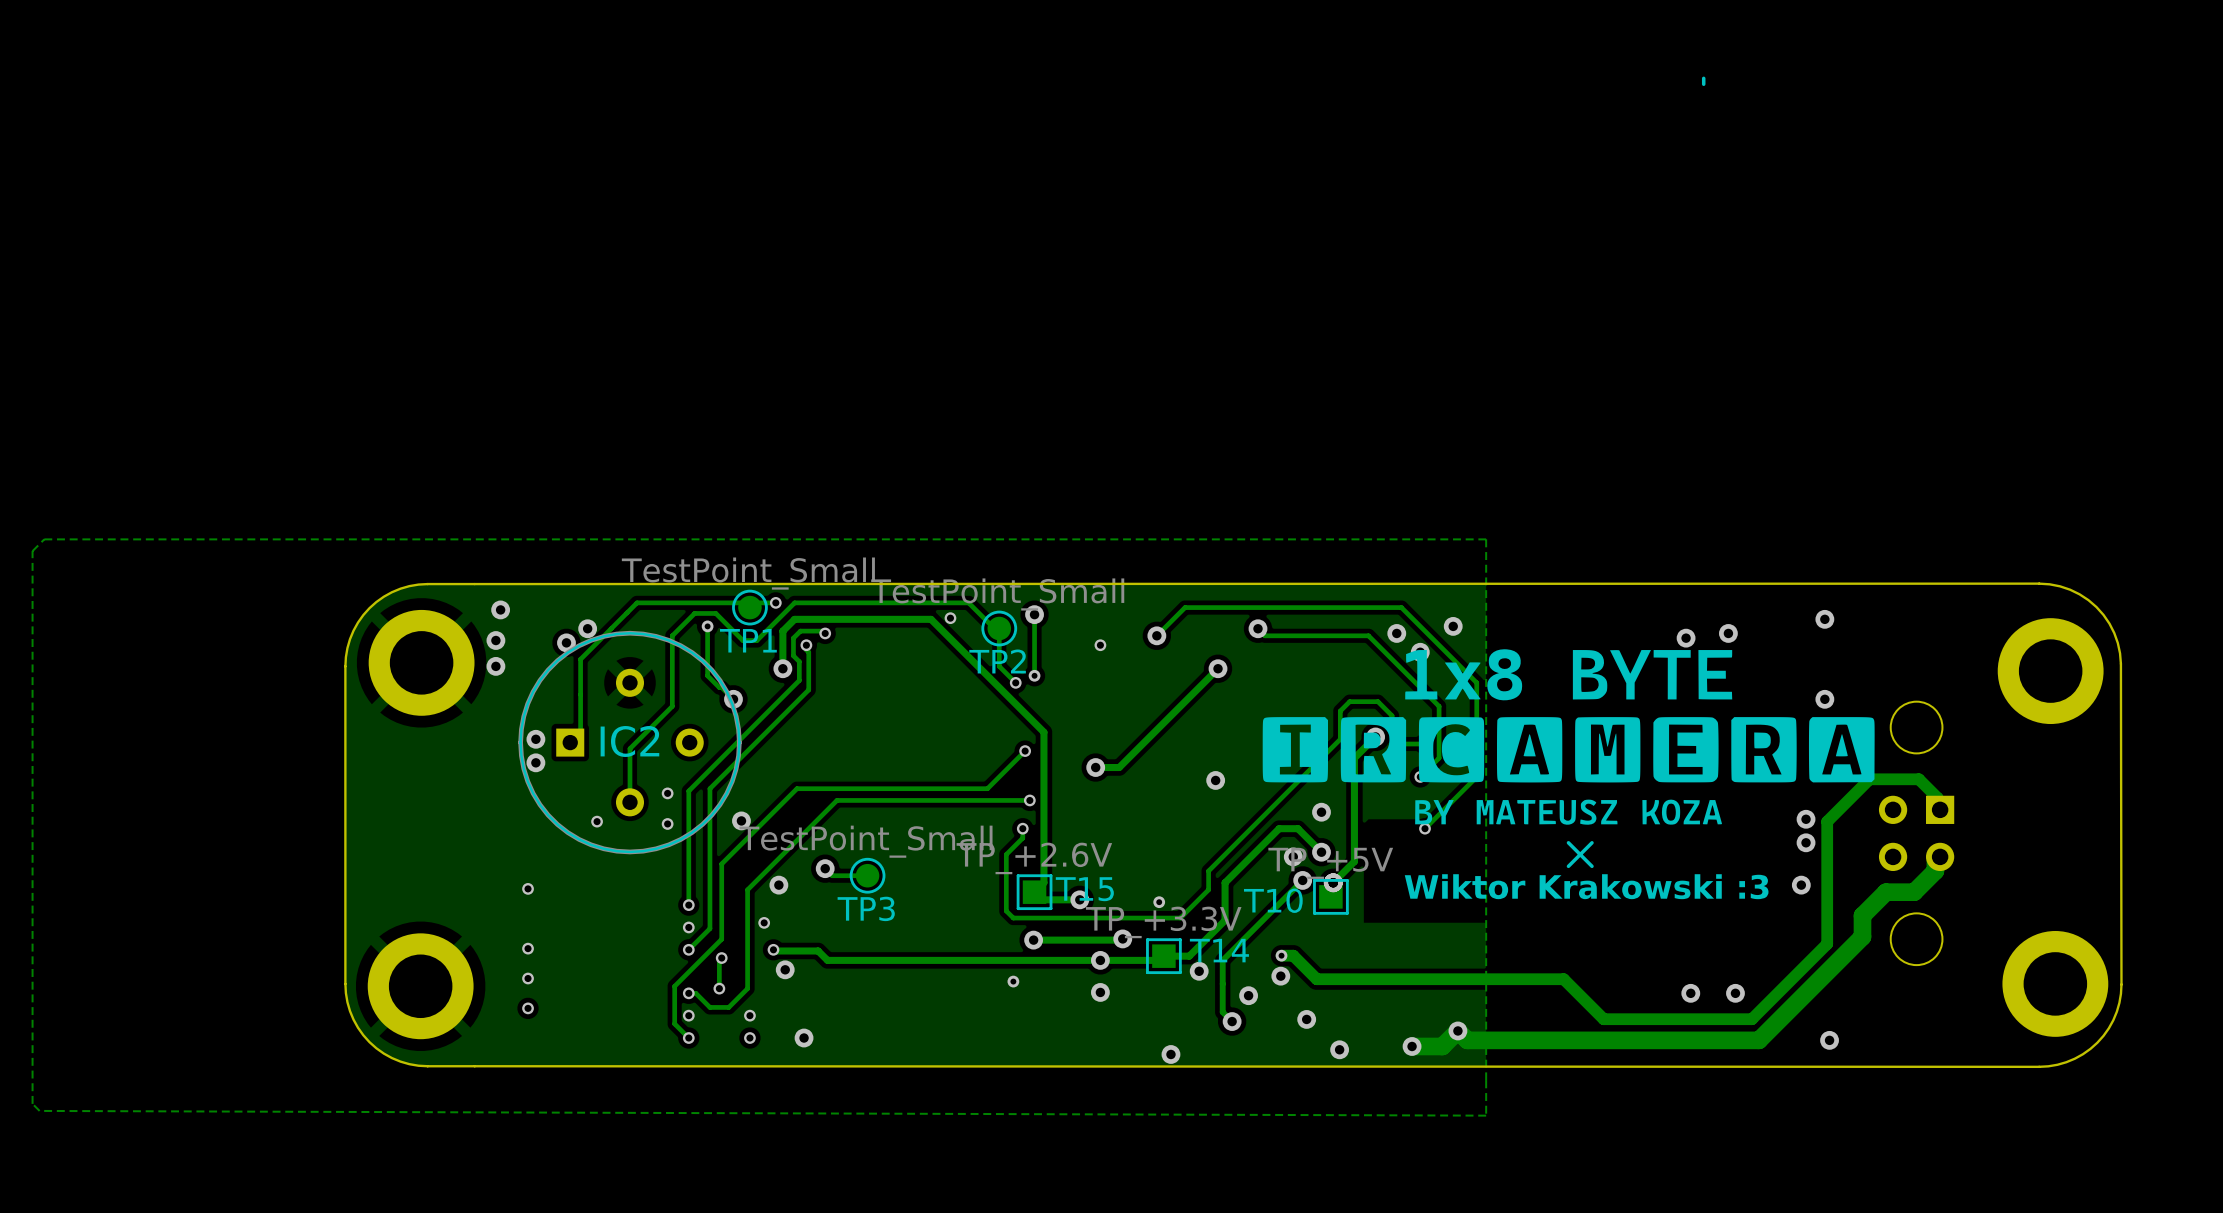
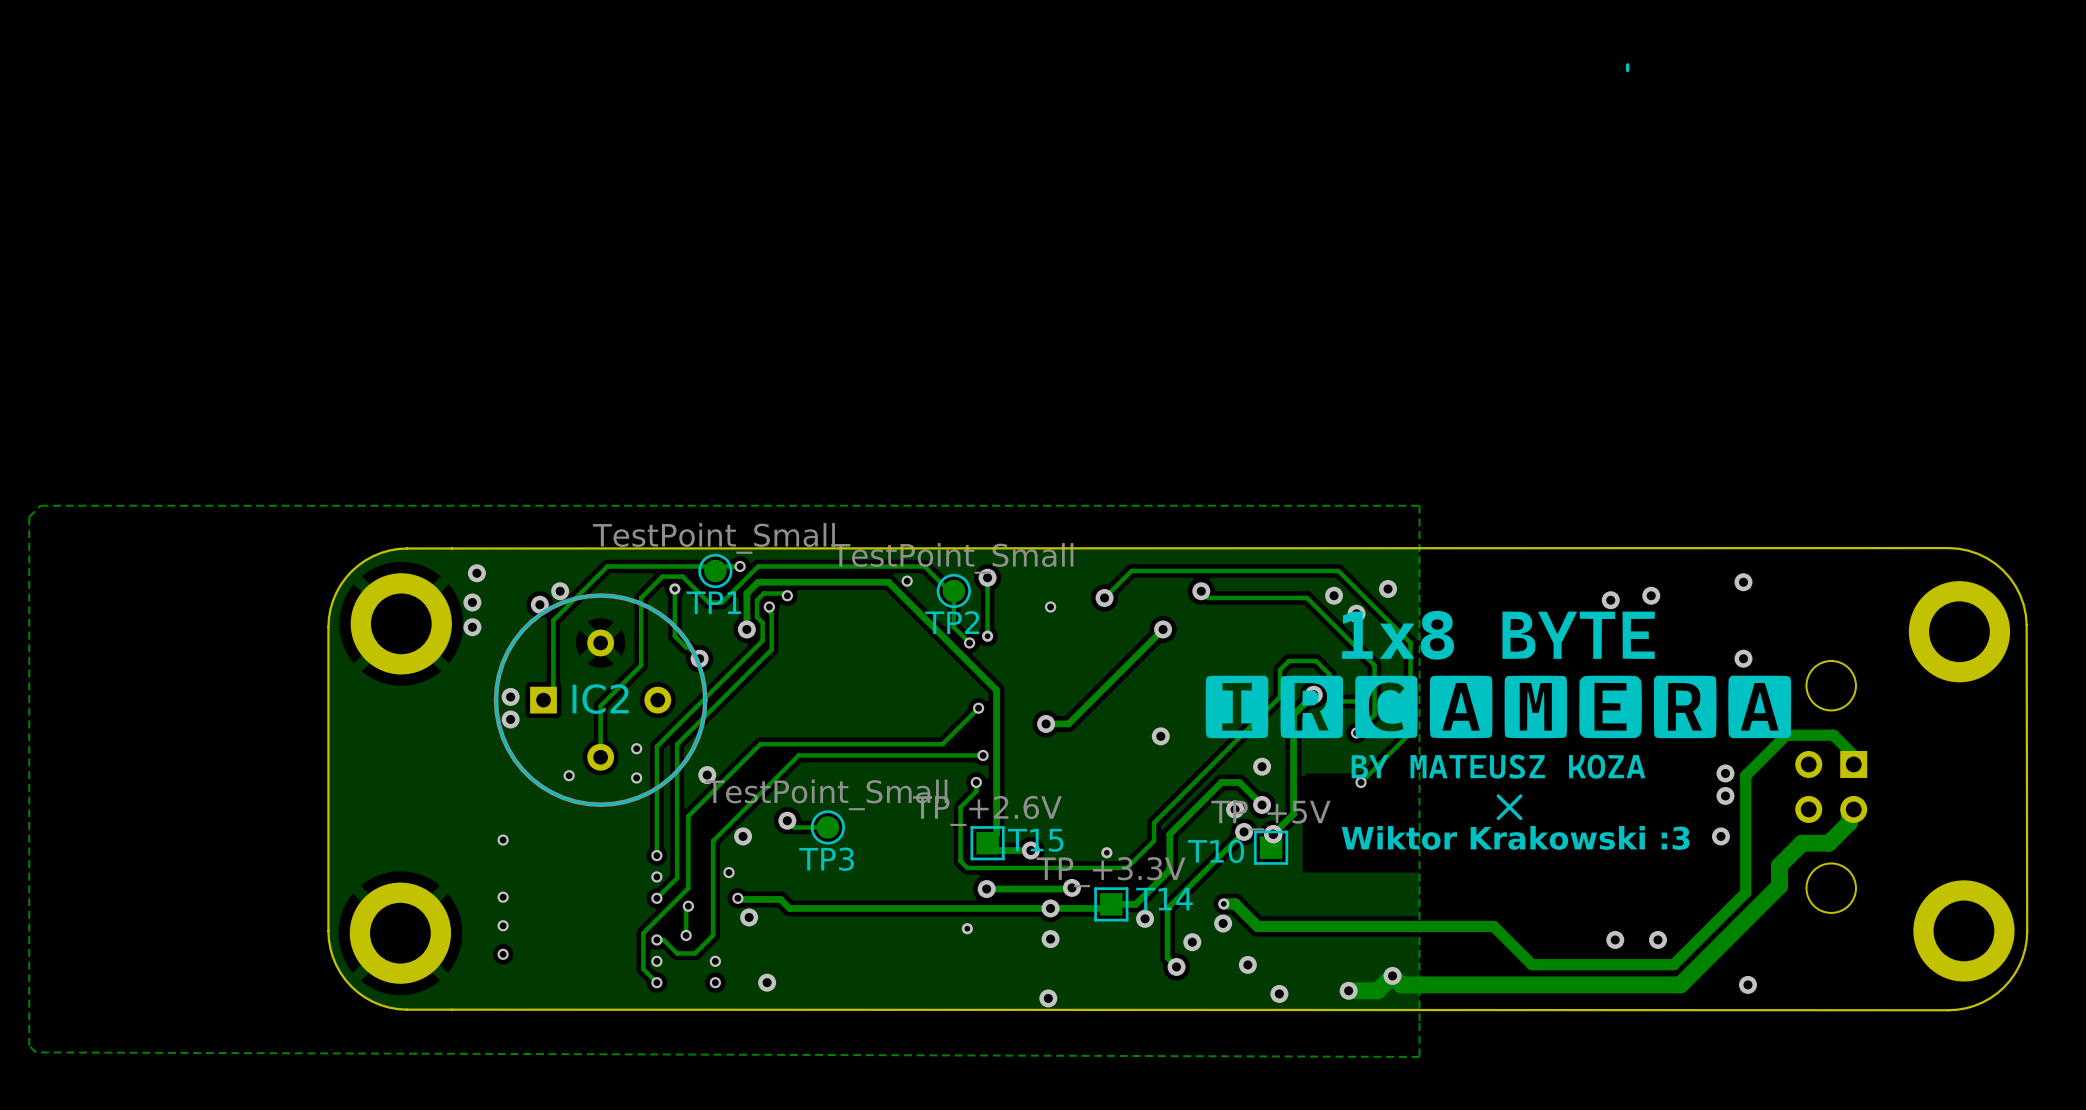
via position: (1170, 1054) -> (1048, 998)

